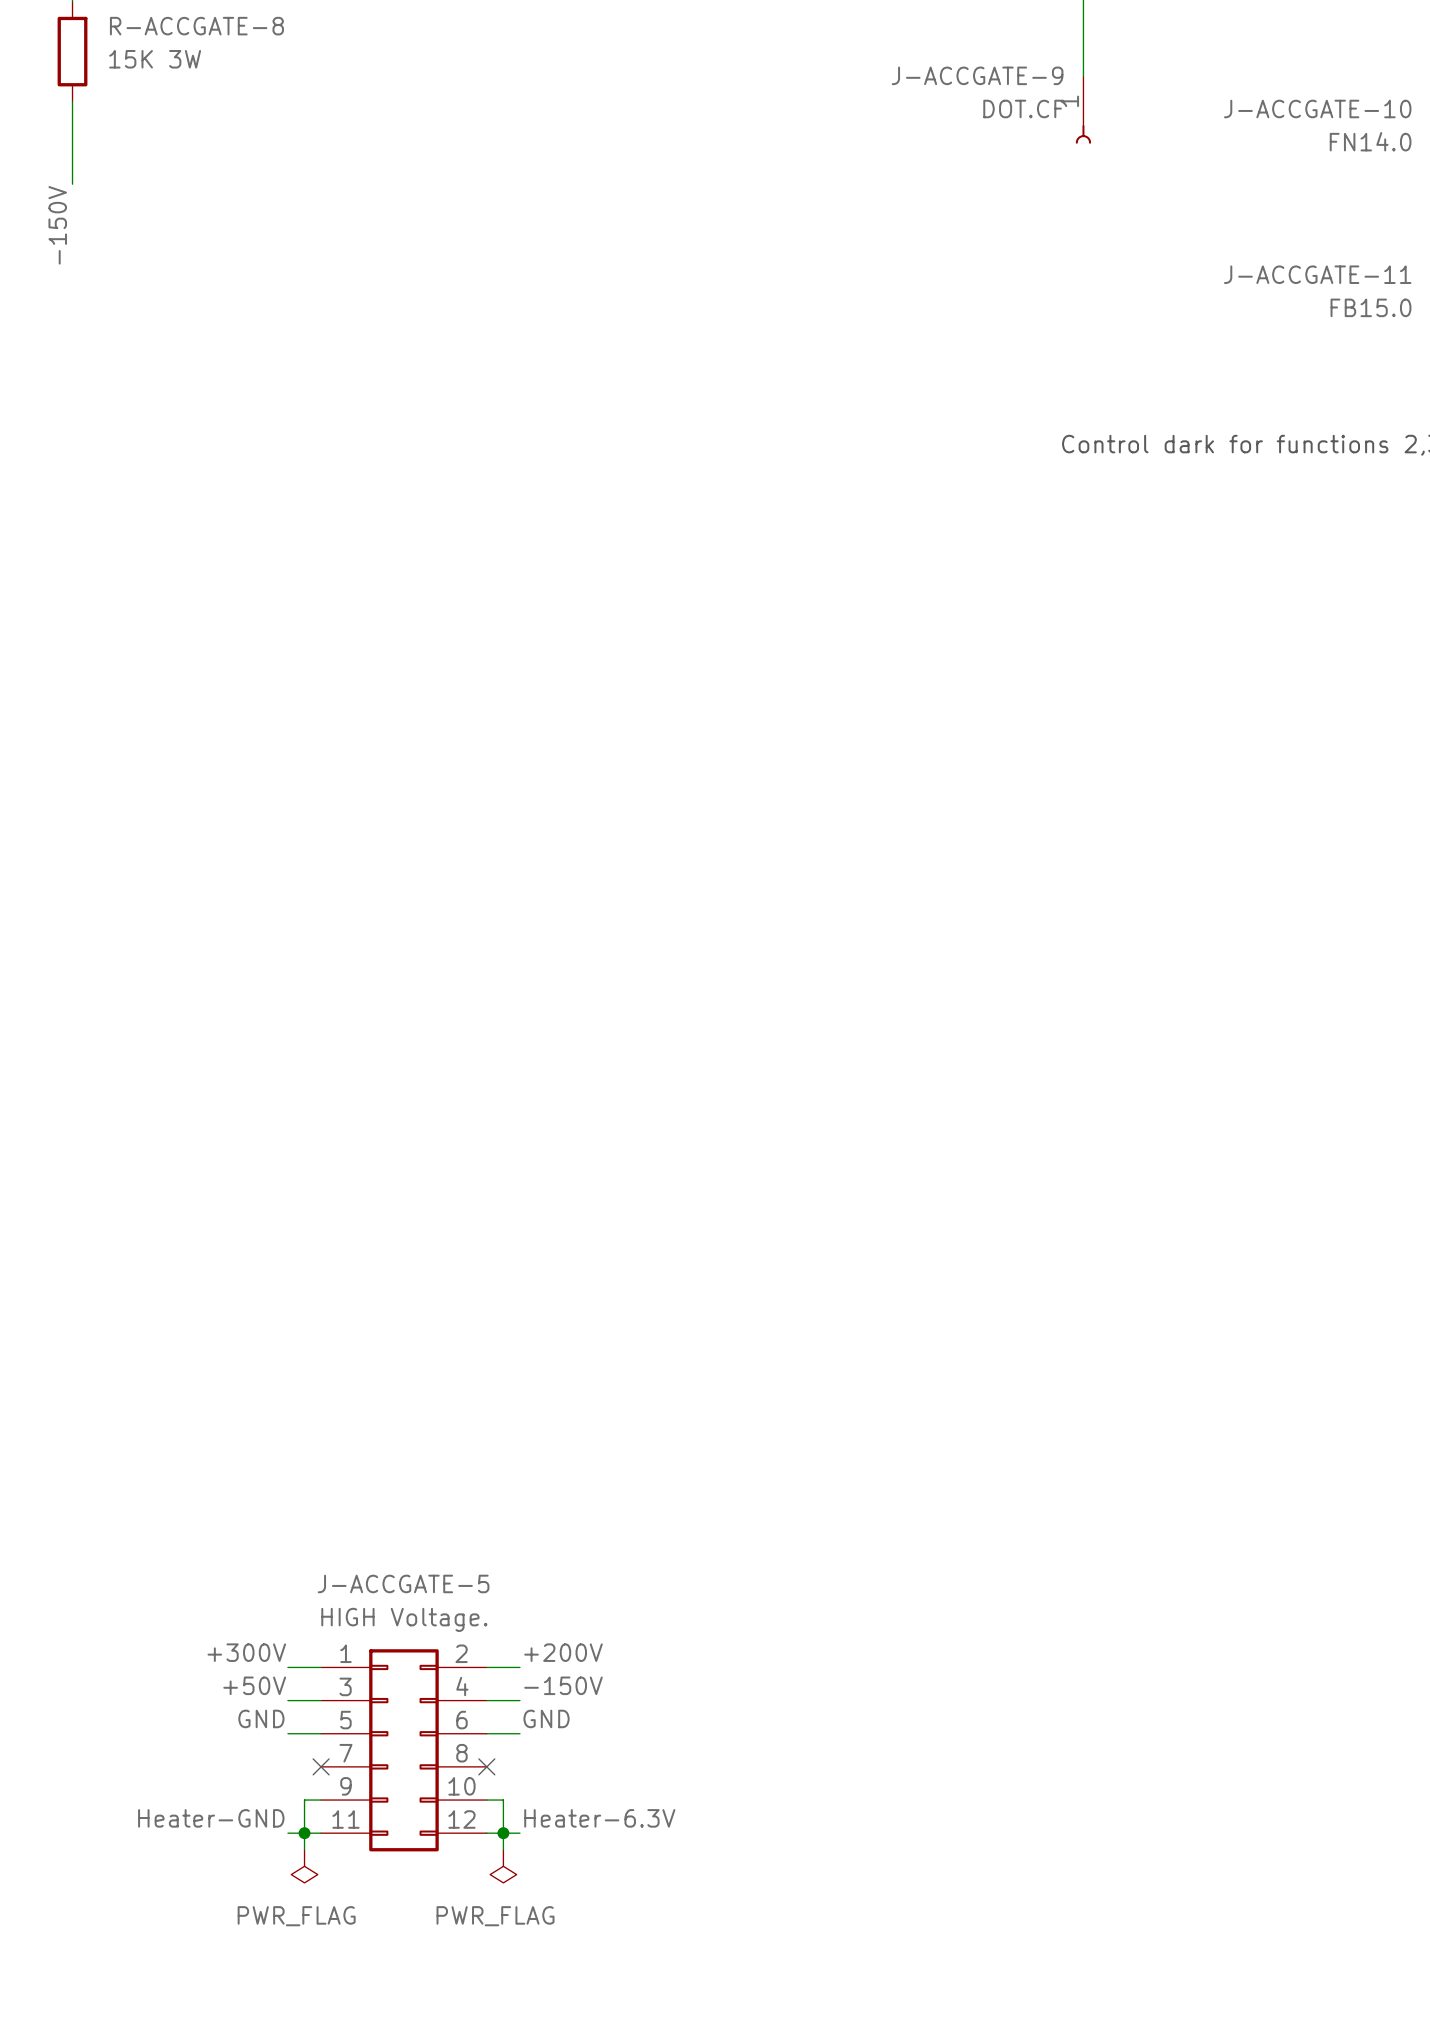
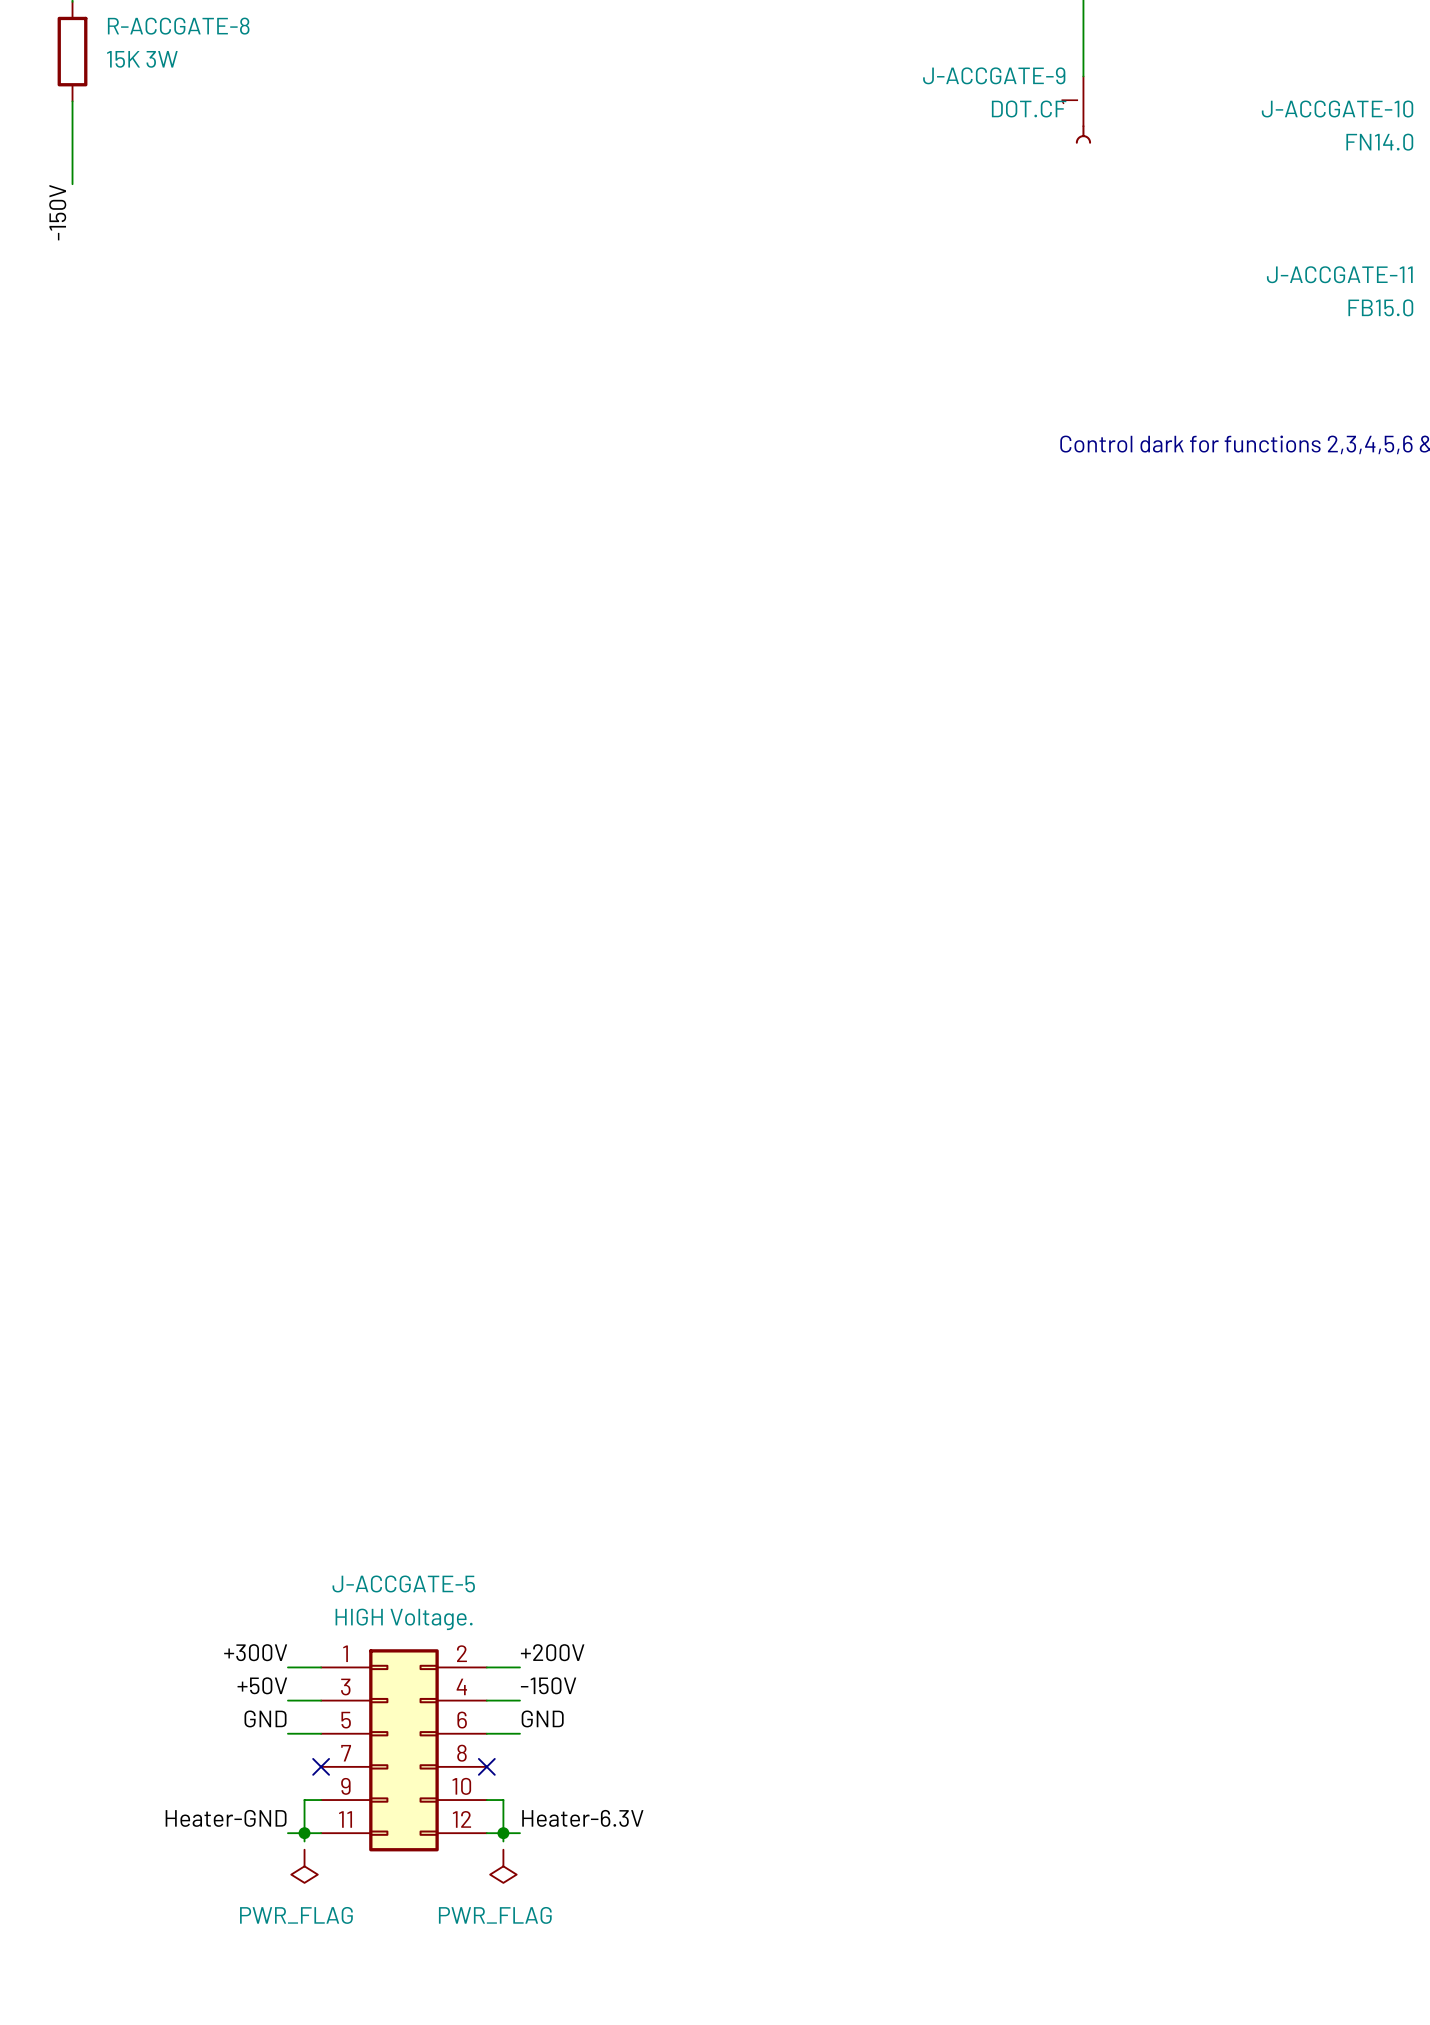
wire: (304, 1841) (304, 1849) -> none
wire: (503, 1841) (503, 1849) -> none

